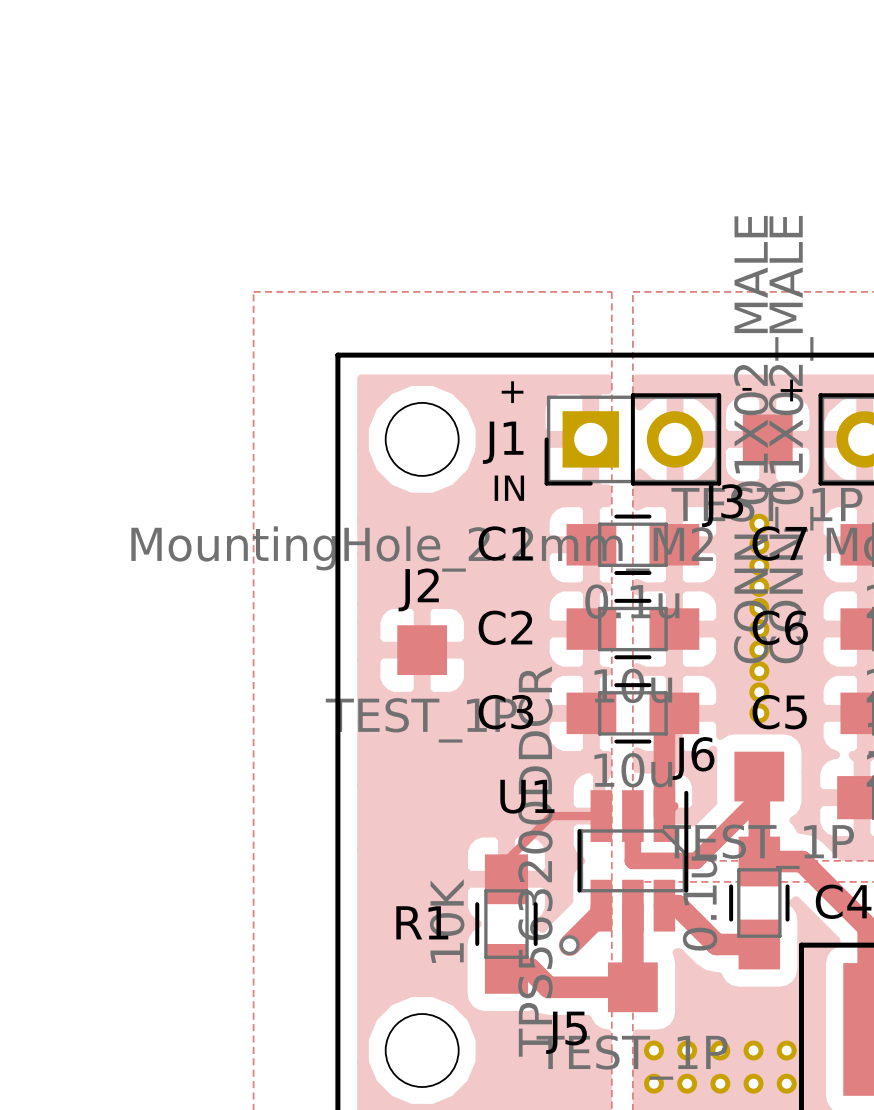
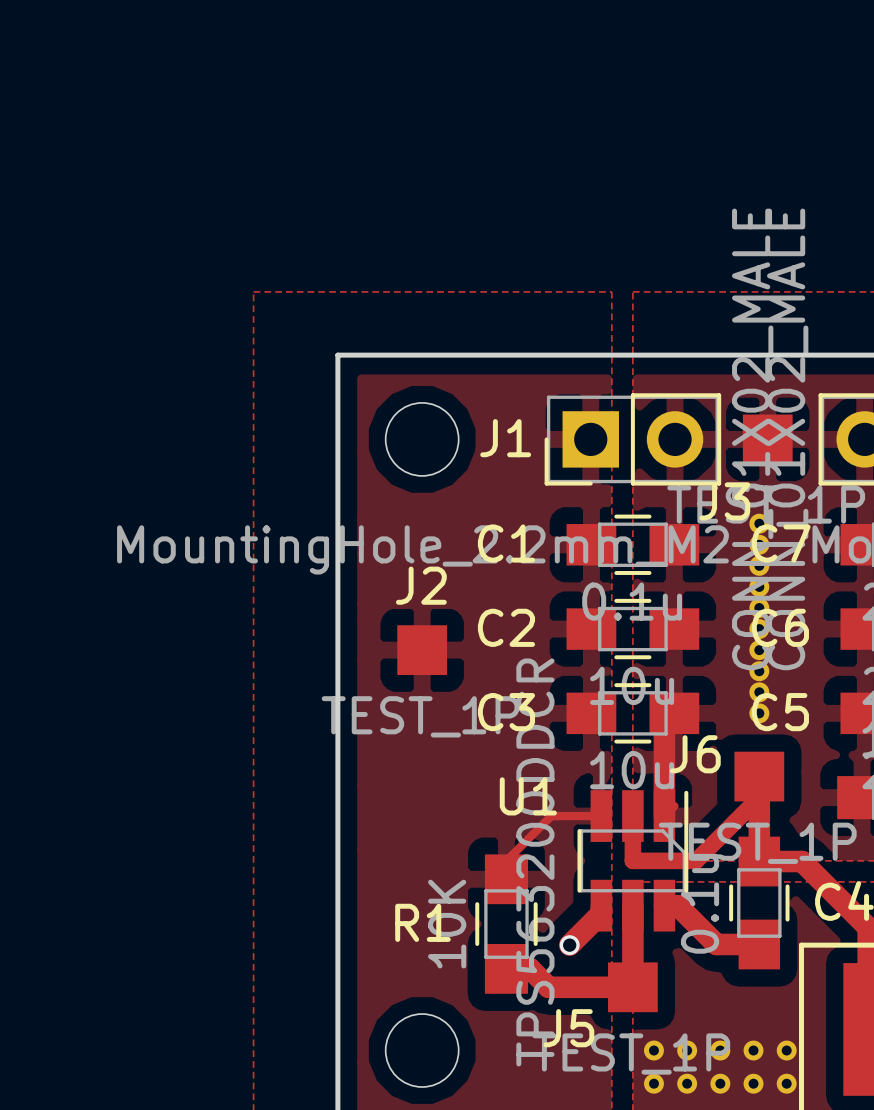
text: - (747, 389) -> none
text: + (791, 390) -> none
text: + (512, 392) -> none
text: IN (509, 488) -> none

